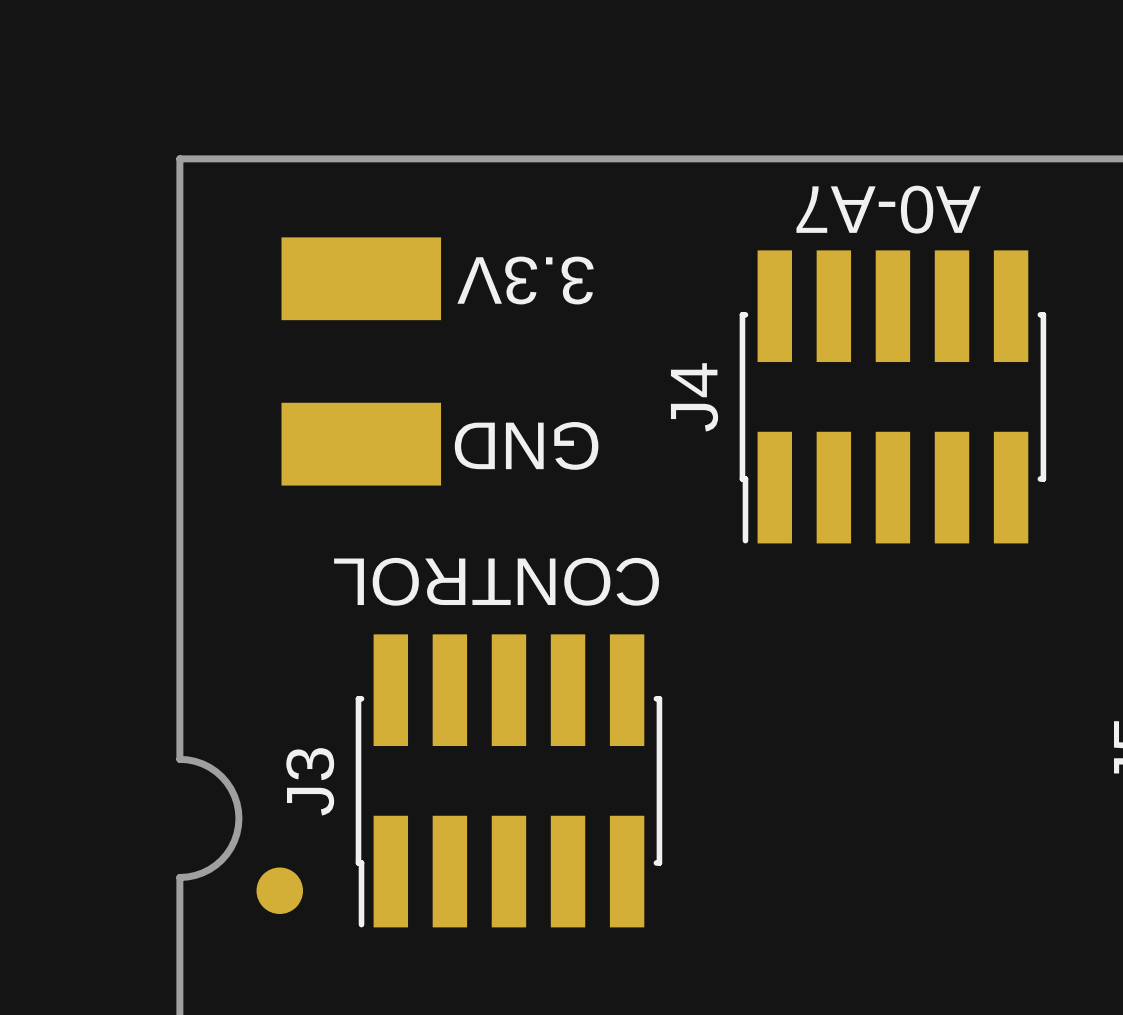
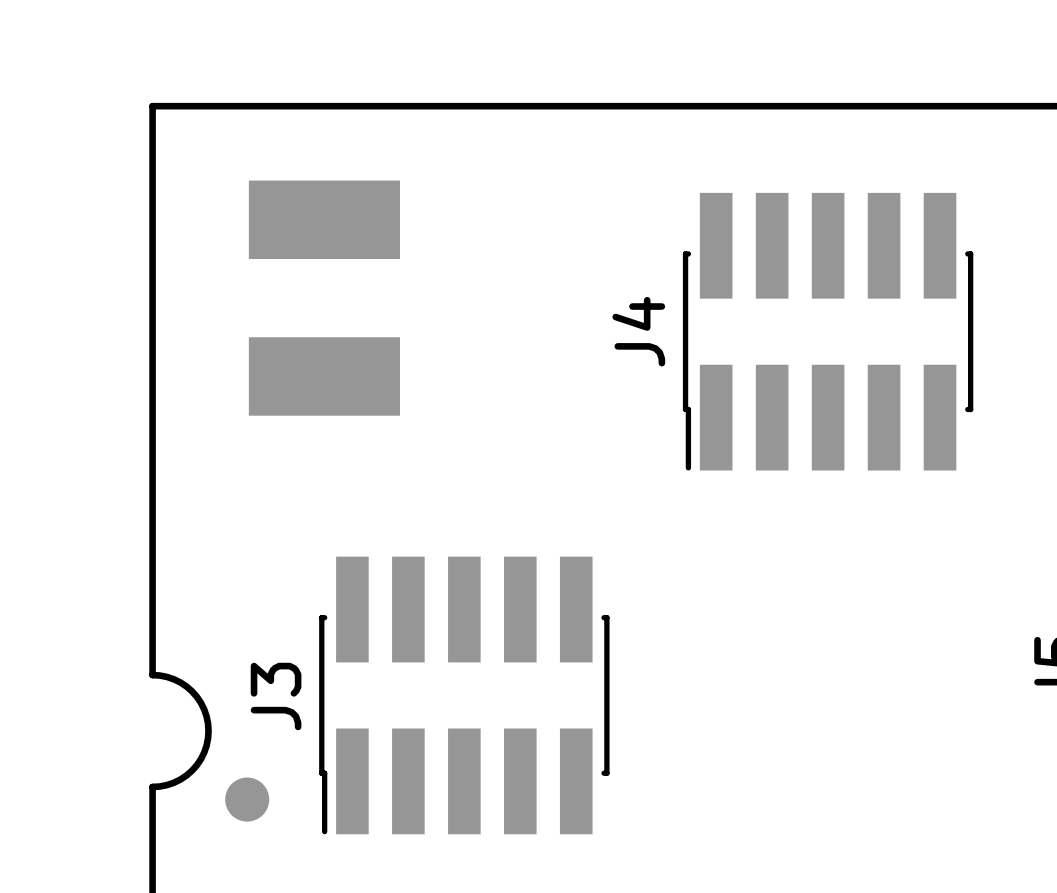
text: A0-A7 (888, 209) -> none
text: 3.3V (525, 280) -> none
text: GND (526, 445) -> none
text: CONTROL (496, 581) -> none

